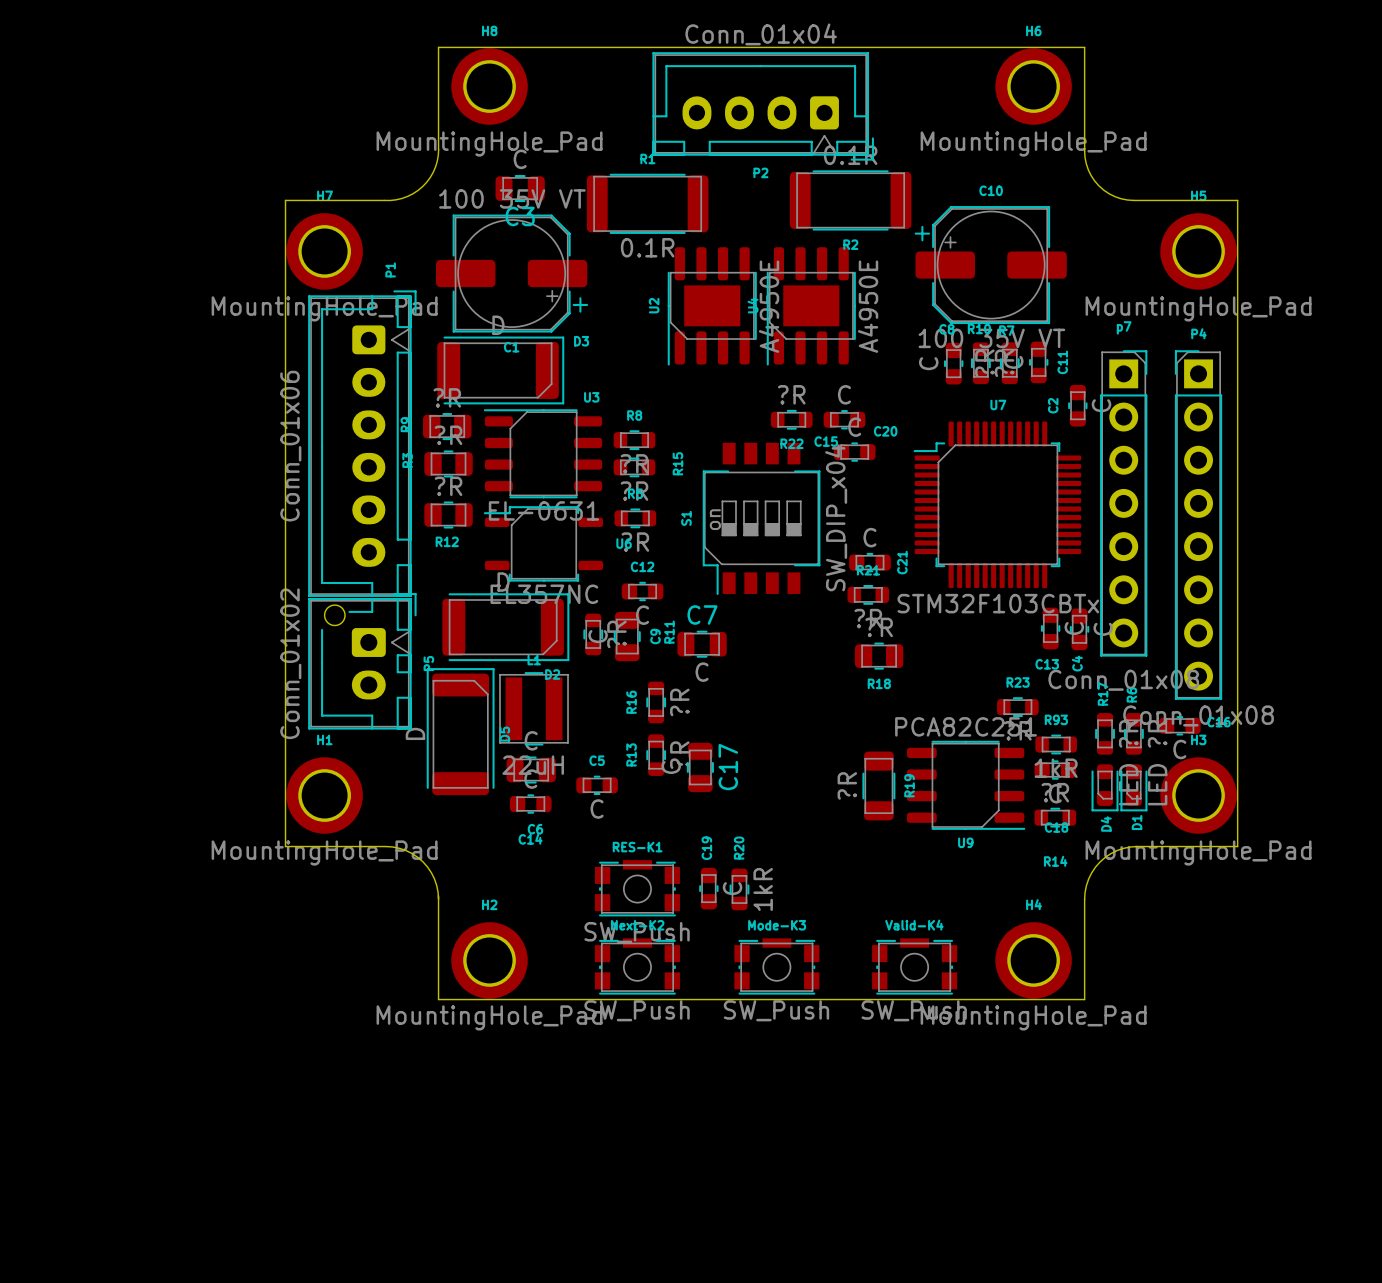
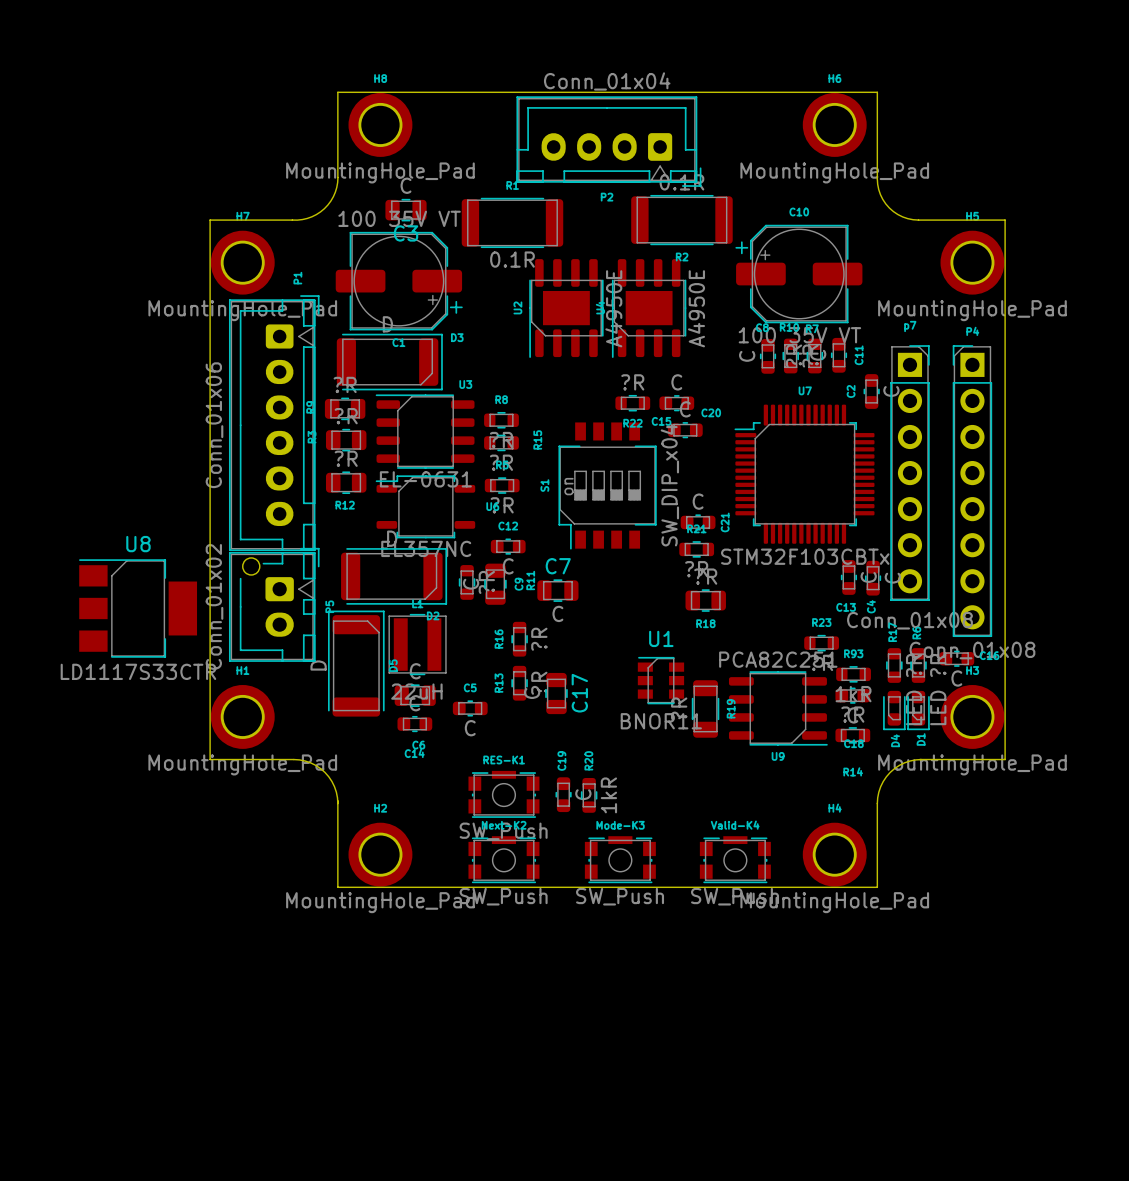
U8: none -> LD1117S33CTR (138, 608)
U1: none -> BNOR11 (660, 680)

